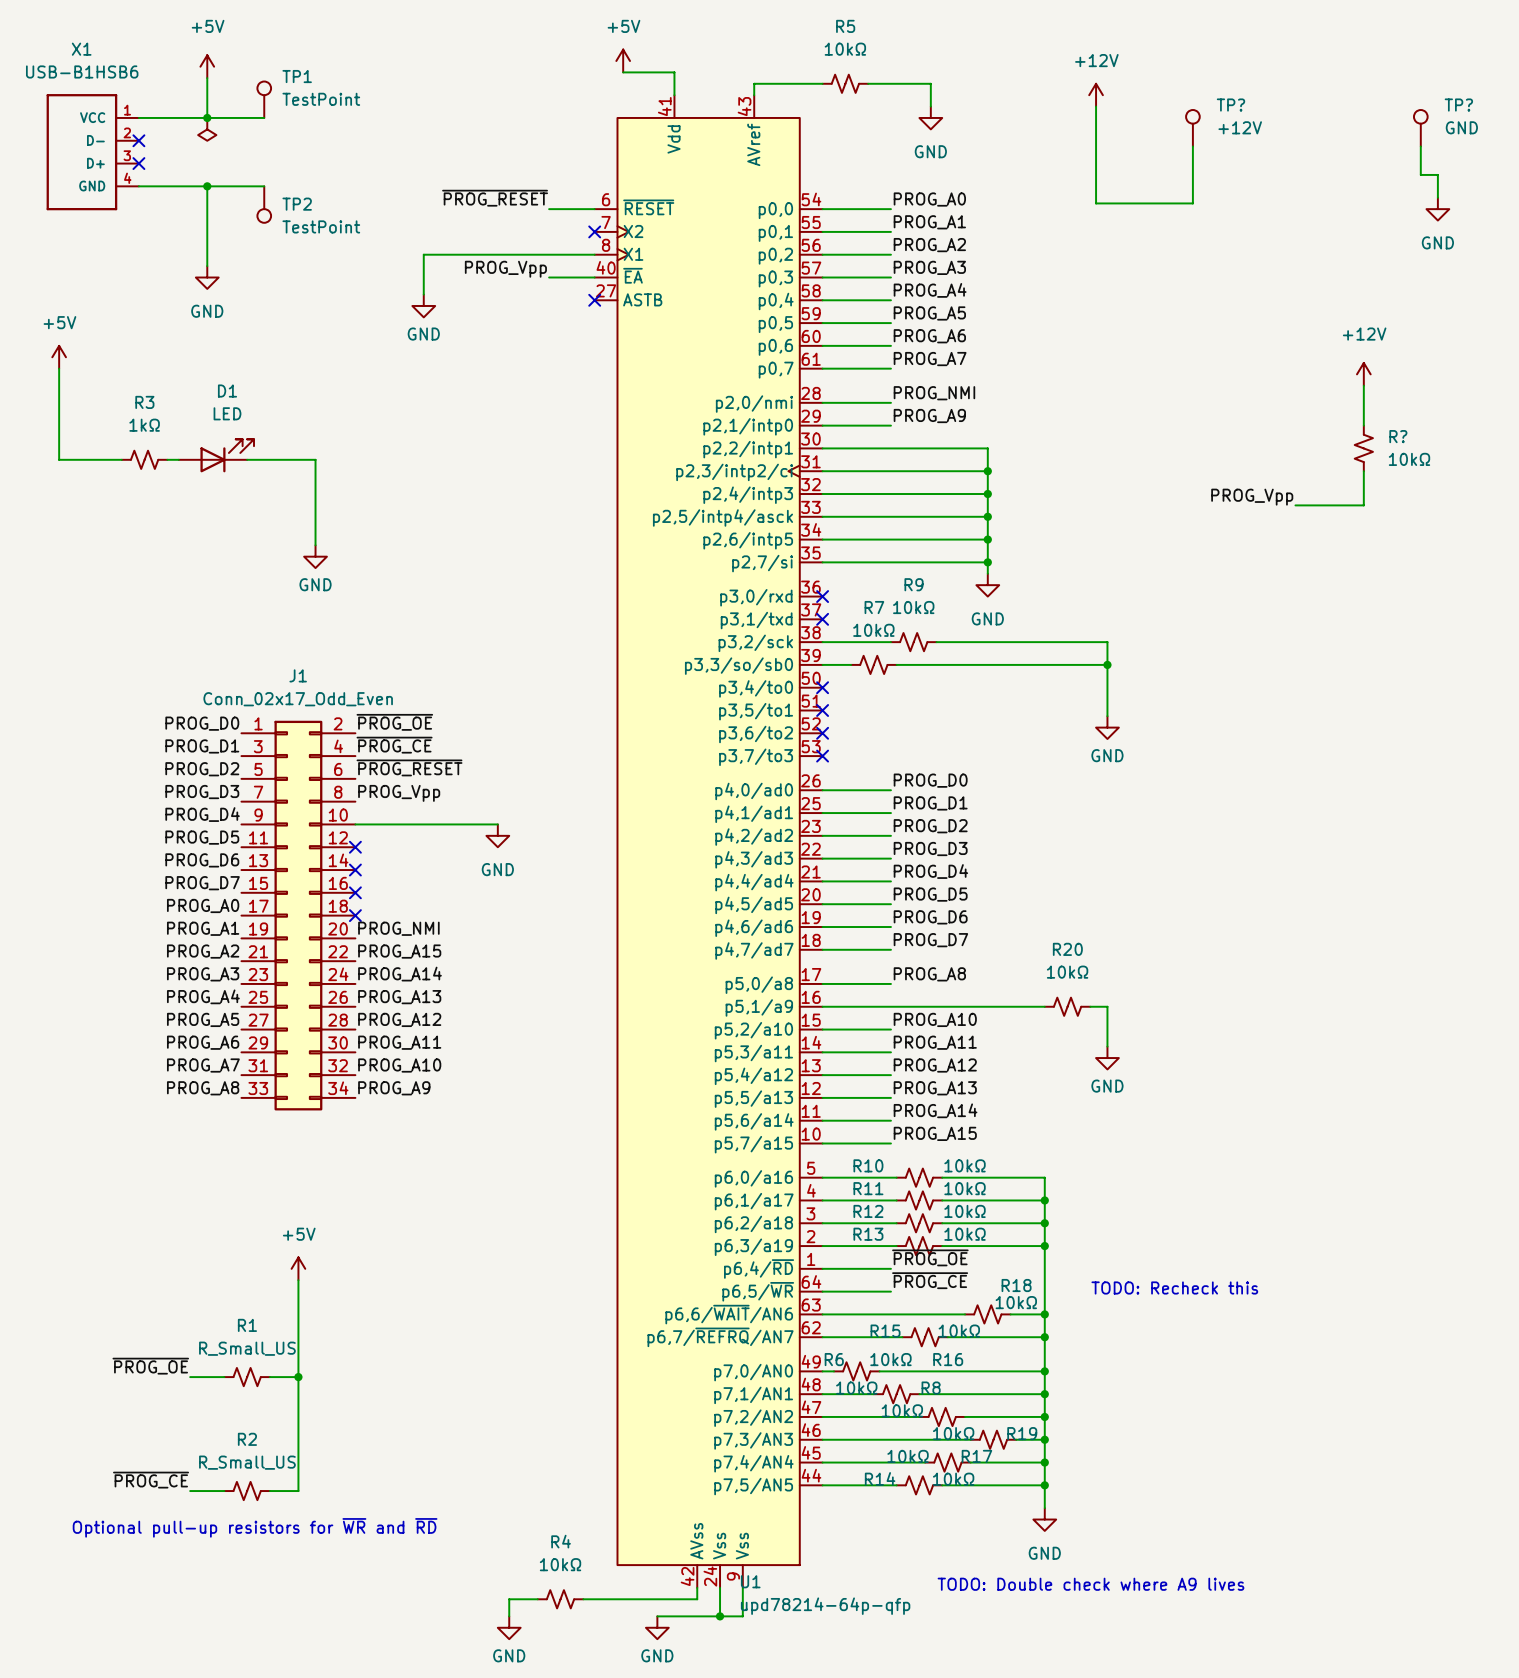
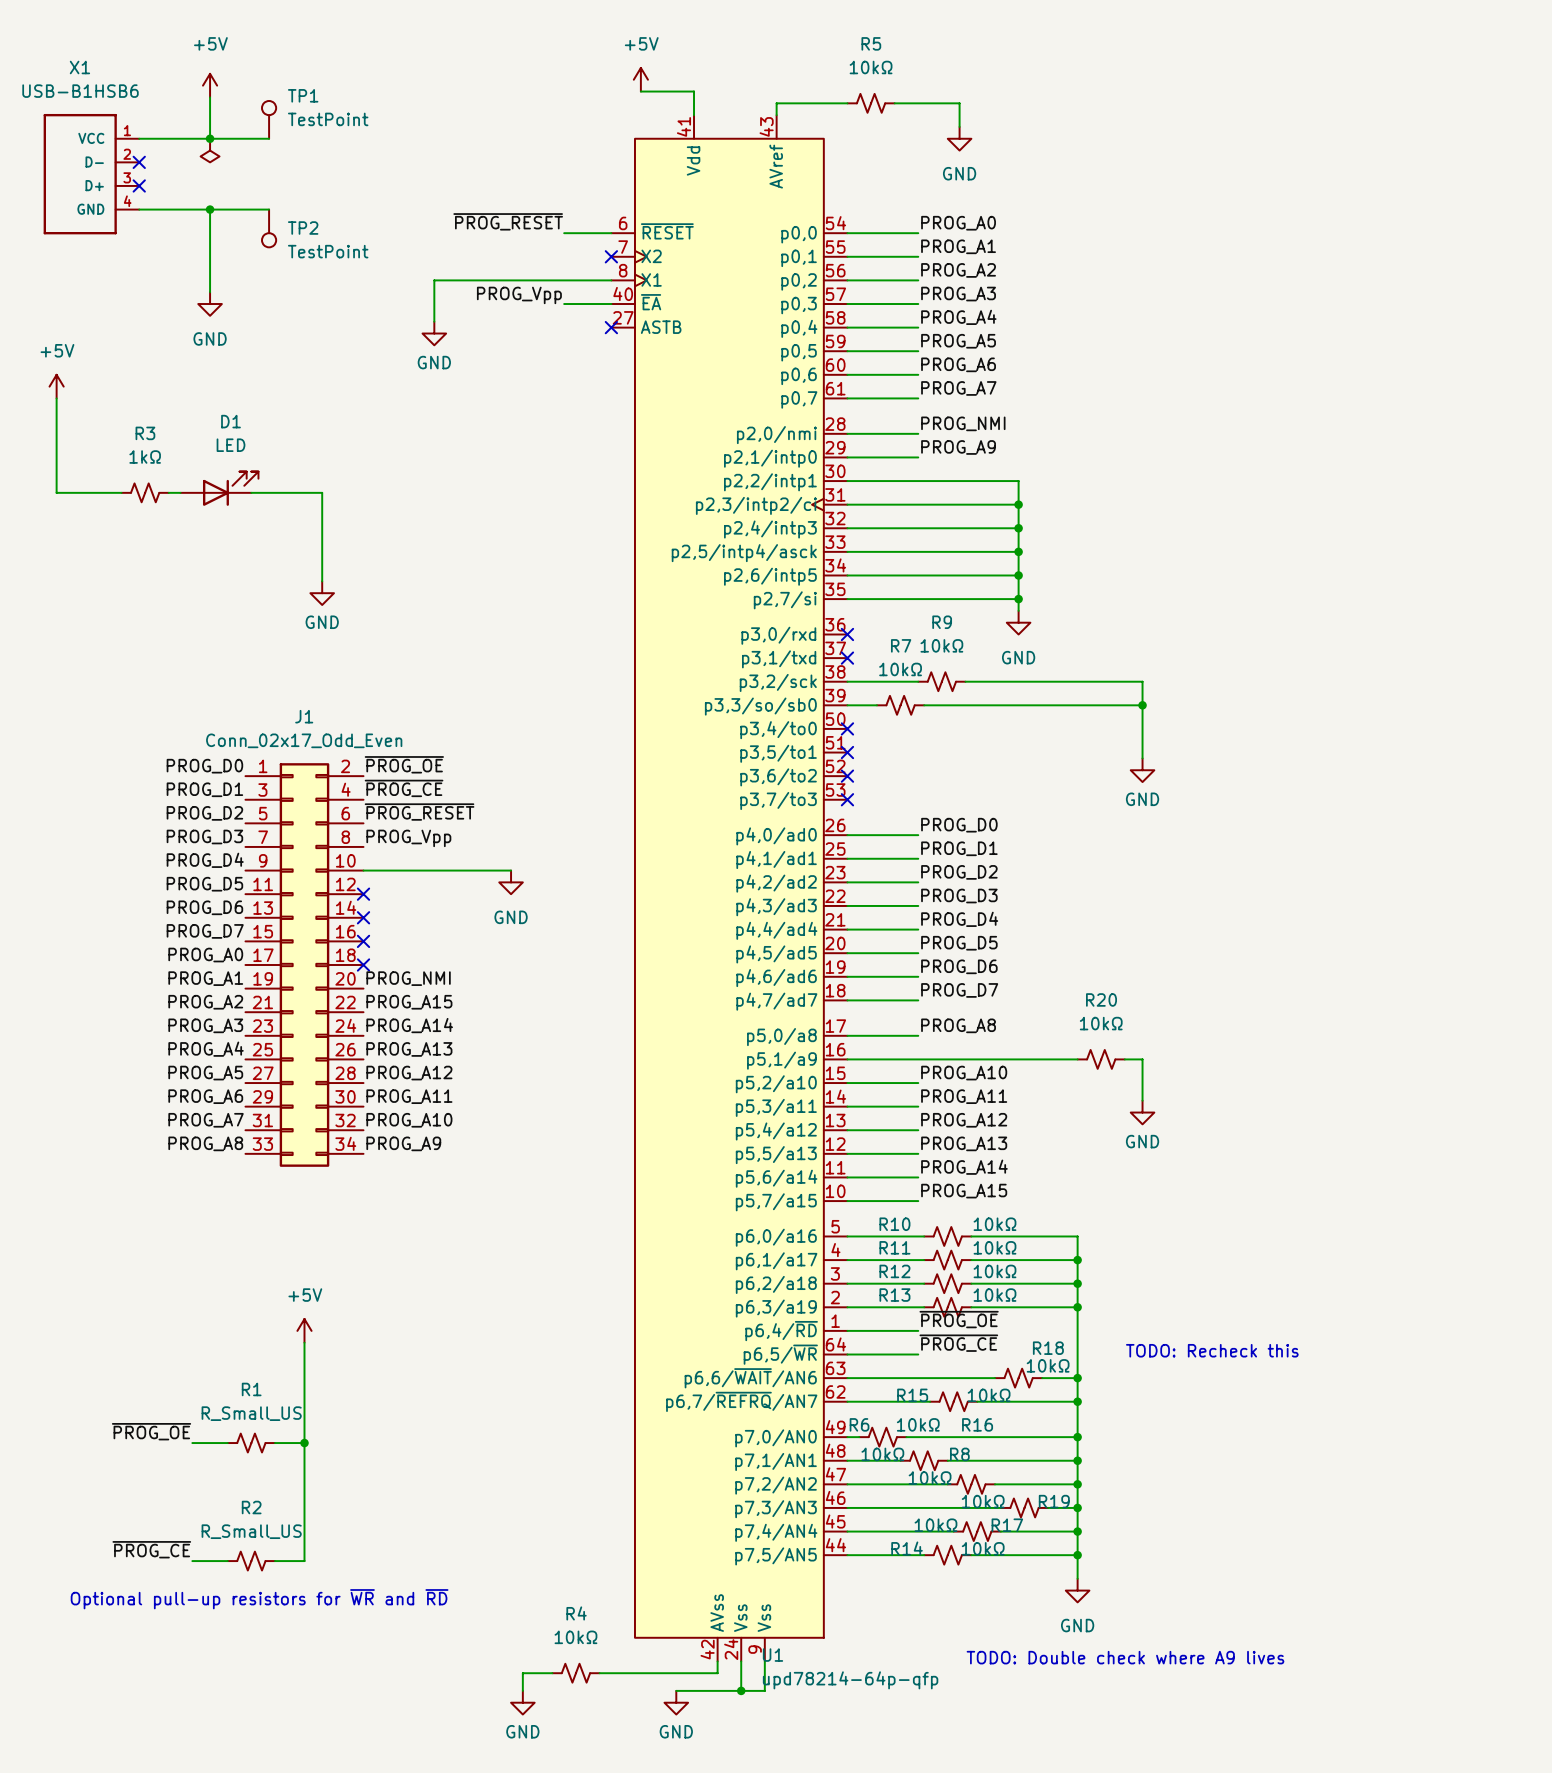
power symbol: +12V (1096, 95) -> none
wire: (1096, 106) (1096, 203) (1192, 203) (1192, 146) -> none
TP?: +12V (1192, 128) -> none
TP?: GND (1420, 128) -> none
wire: (1420, 146) (1420, 174) (1437, 174) (1437, 197) -> none
power symbol: GND (1437, 209) -> none
power symbol: +12V (1363, 374) -> none
wire: (1363, 385) (1363, 425) -> none
R?: 10kΩ (1363, 448) -> none
wire: (1363, 471) (1363, 505) (1295, 505) -> none
label: PROG_Vpp (1252, 497) -> none

